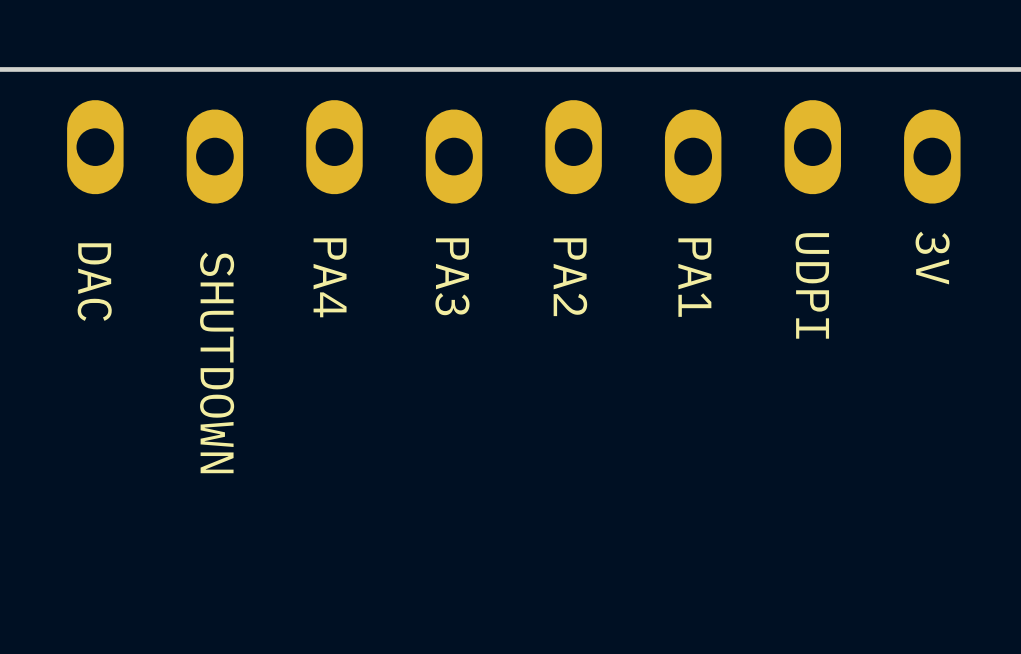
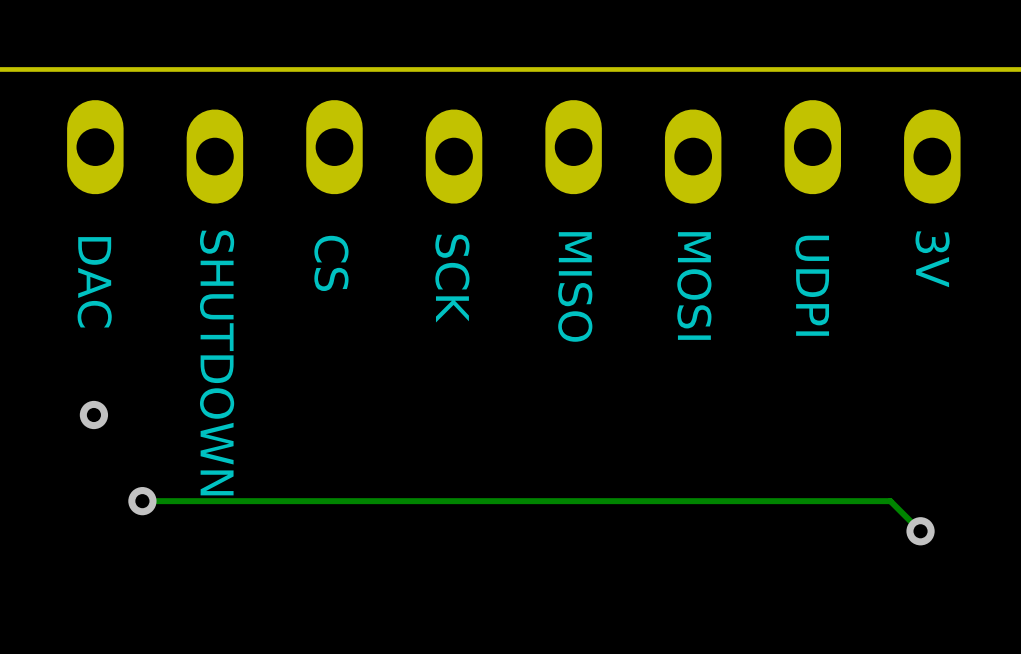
text: PA3 (452, 276) -> SCK (452, 278)
text: PA4 (330, 277) -> CS (331, 263)
text: PA2 (570, 277) -> MISO (575, 286)
text: PA1 (694, 277) -> MOSI (694, 286)
via: none -> (93, 414)
track: none -> (142, 501) (890, 501) (920, 531)
via: none -> (142, 501)
via: none -> (920, 531)

